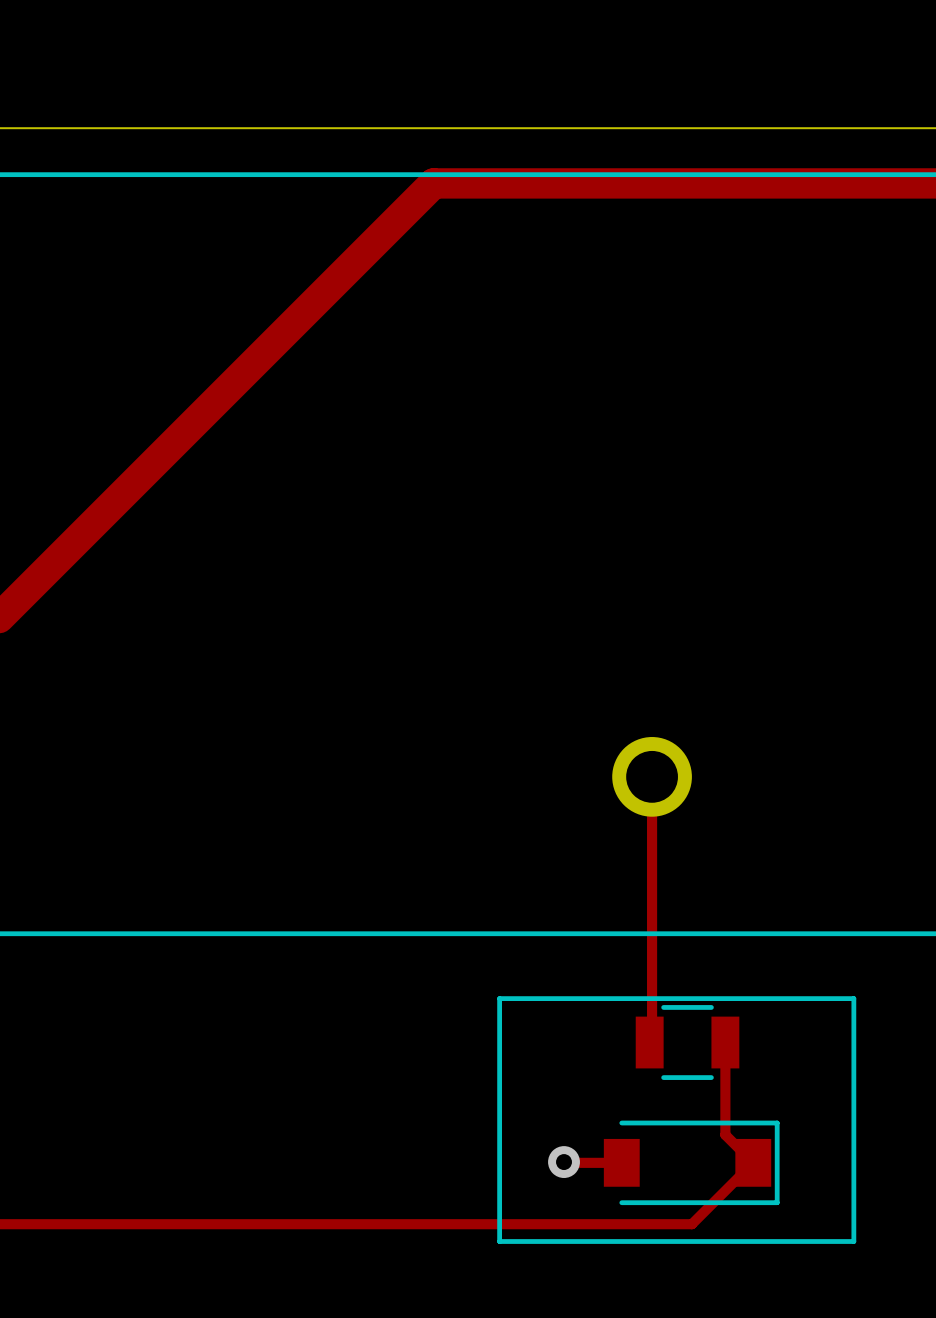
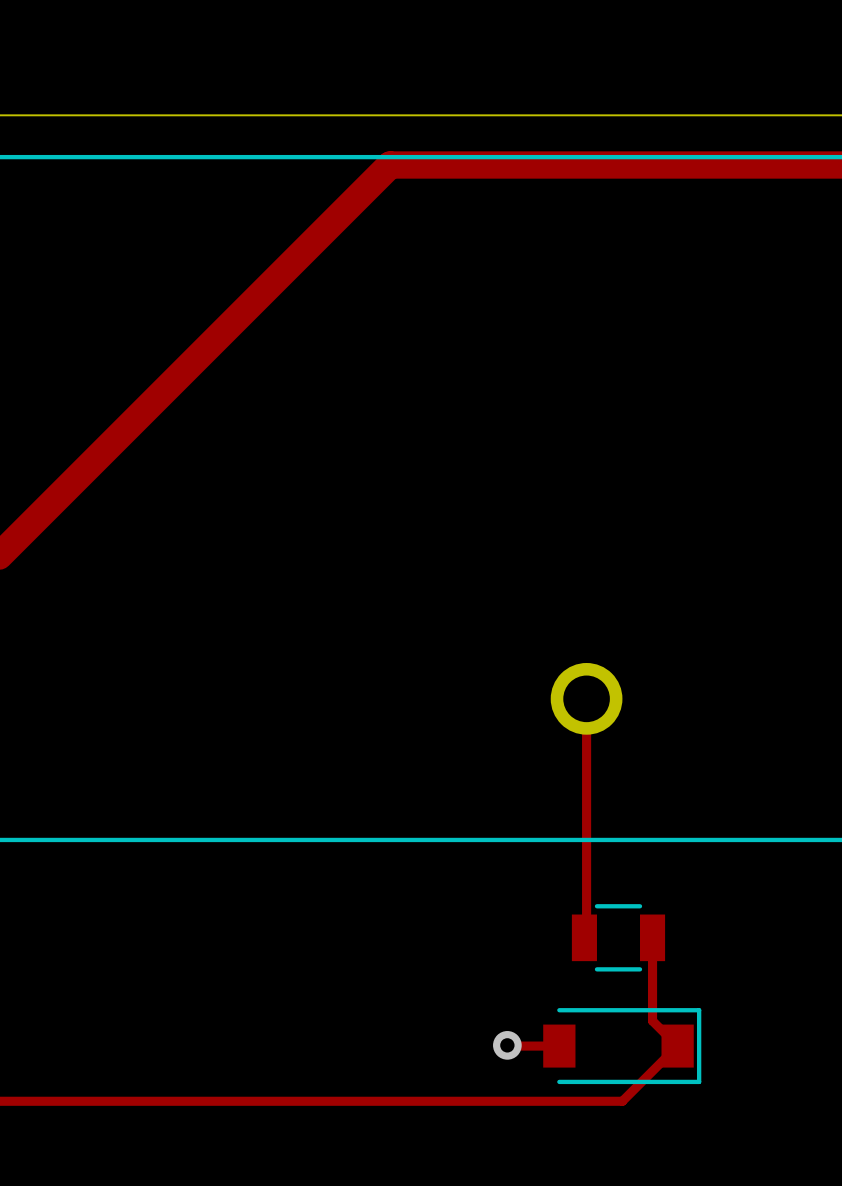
line: (499, 998) (853, 998) (853, 1241) (499, 1241) (499, 998) -> none

